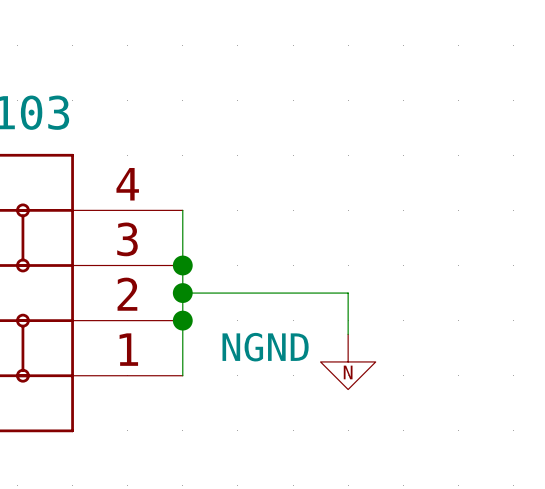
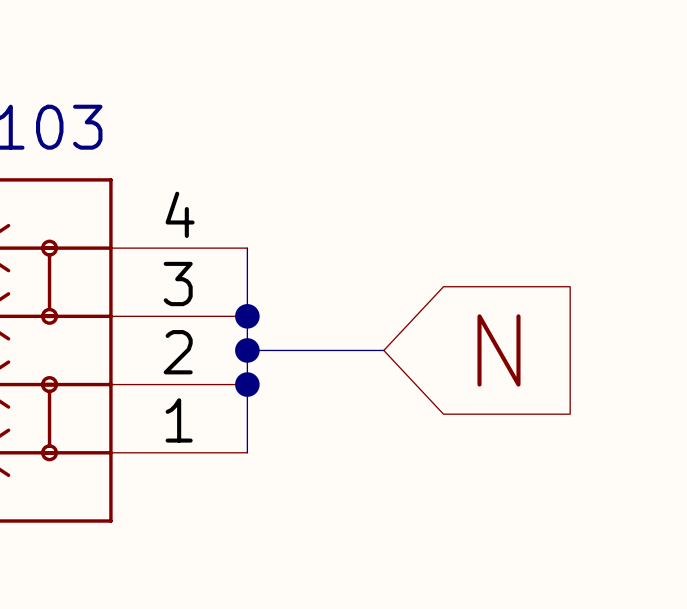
wire: (293, 293) (348, 293) (348, 334) -> none
global label: none -> N (498, 350)
power symbol: NGND (348, 361) -> none

